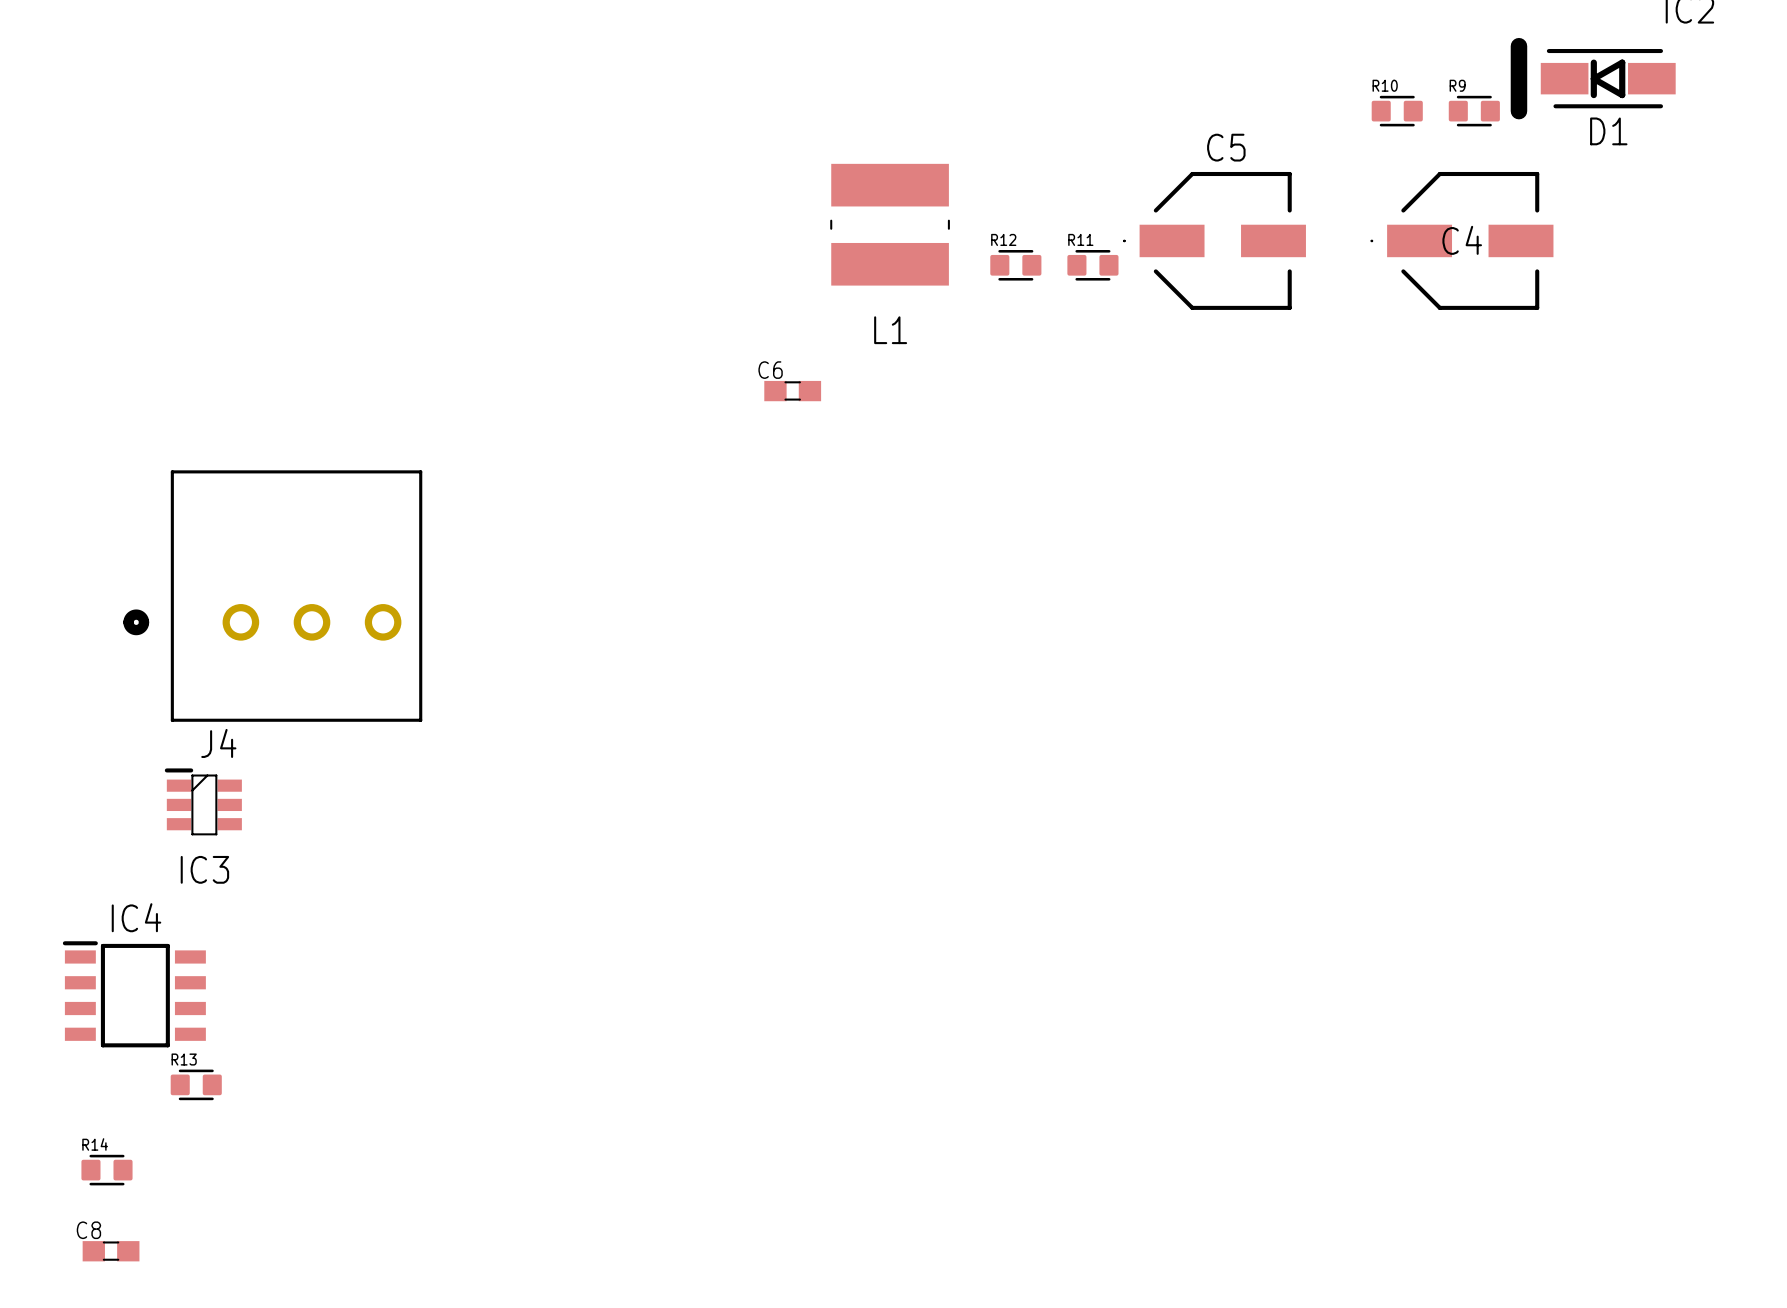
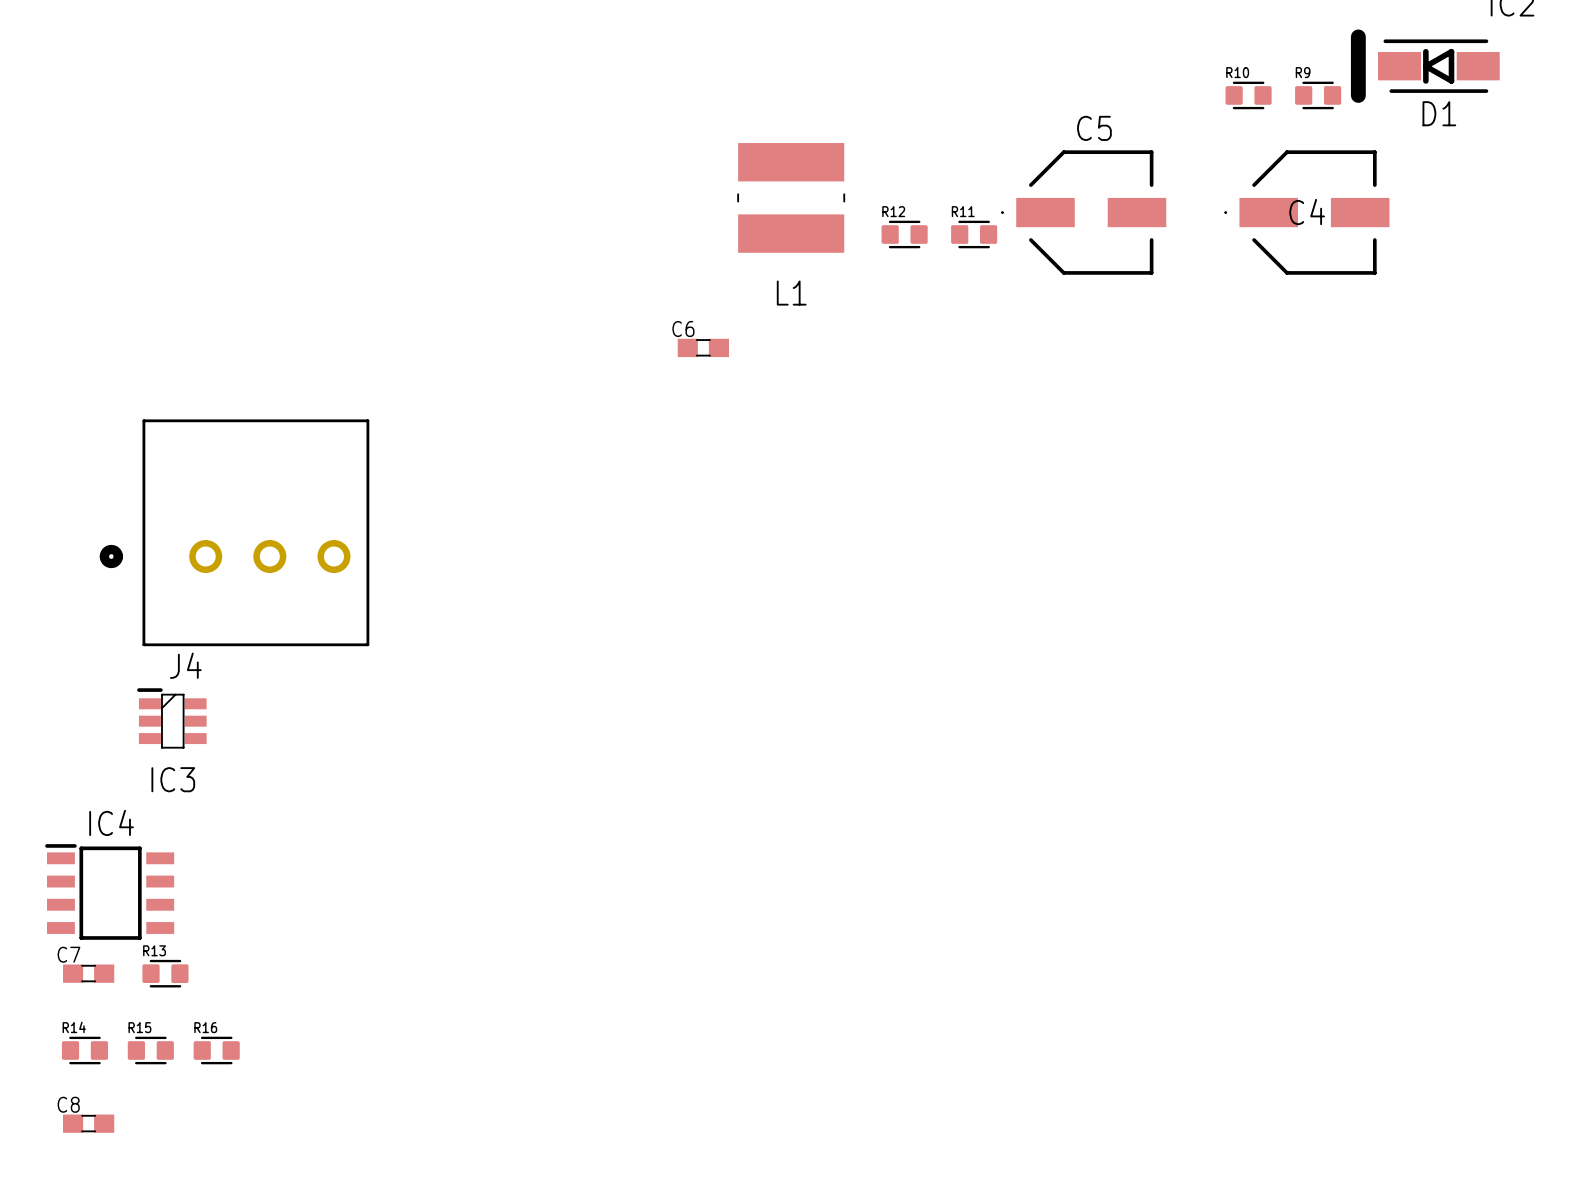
C7: none -> (88, 973)
R15: none -> (150, 1050)
R16: none -> (216, 1050)

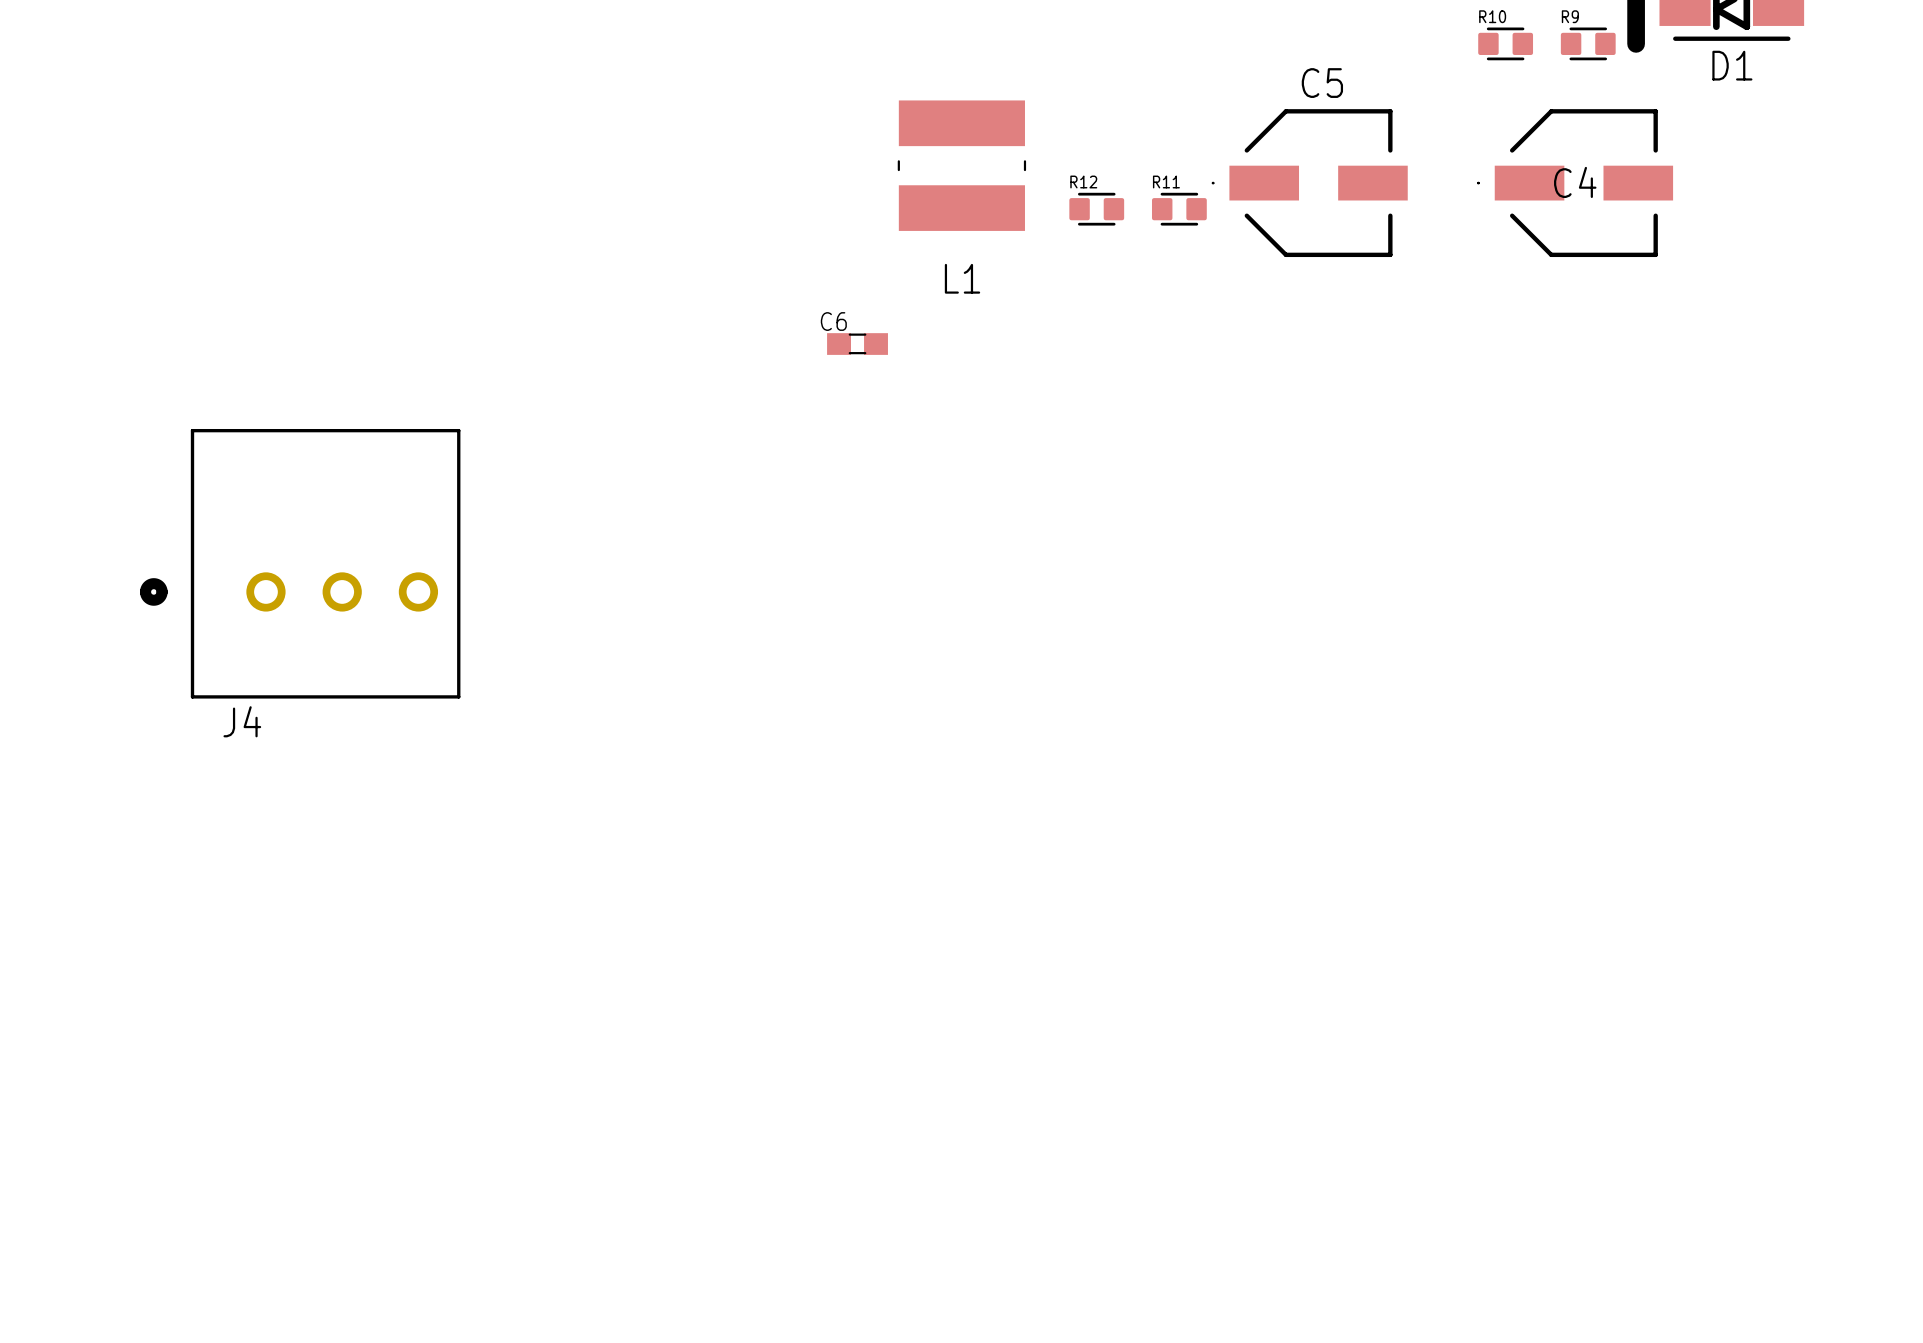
IC3: (171, 718) -> none
IC4: (109, 891) -> none
C7: (88, 973) -> none
R13: (165, 973) -> none
R14: (84, 1050) -> none
R15: (150, 1050) -> none
R16: (216, 1050) -> none
C8: (88, 1123) -> none

